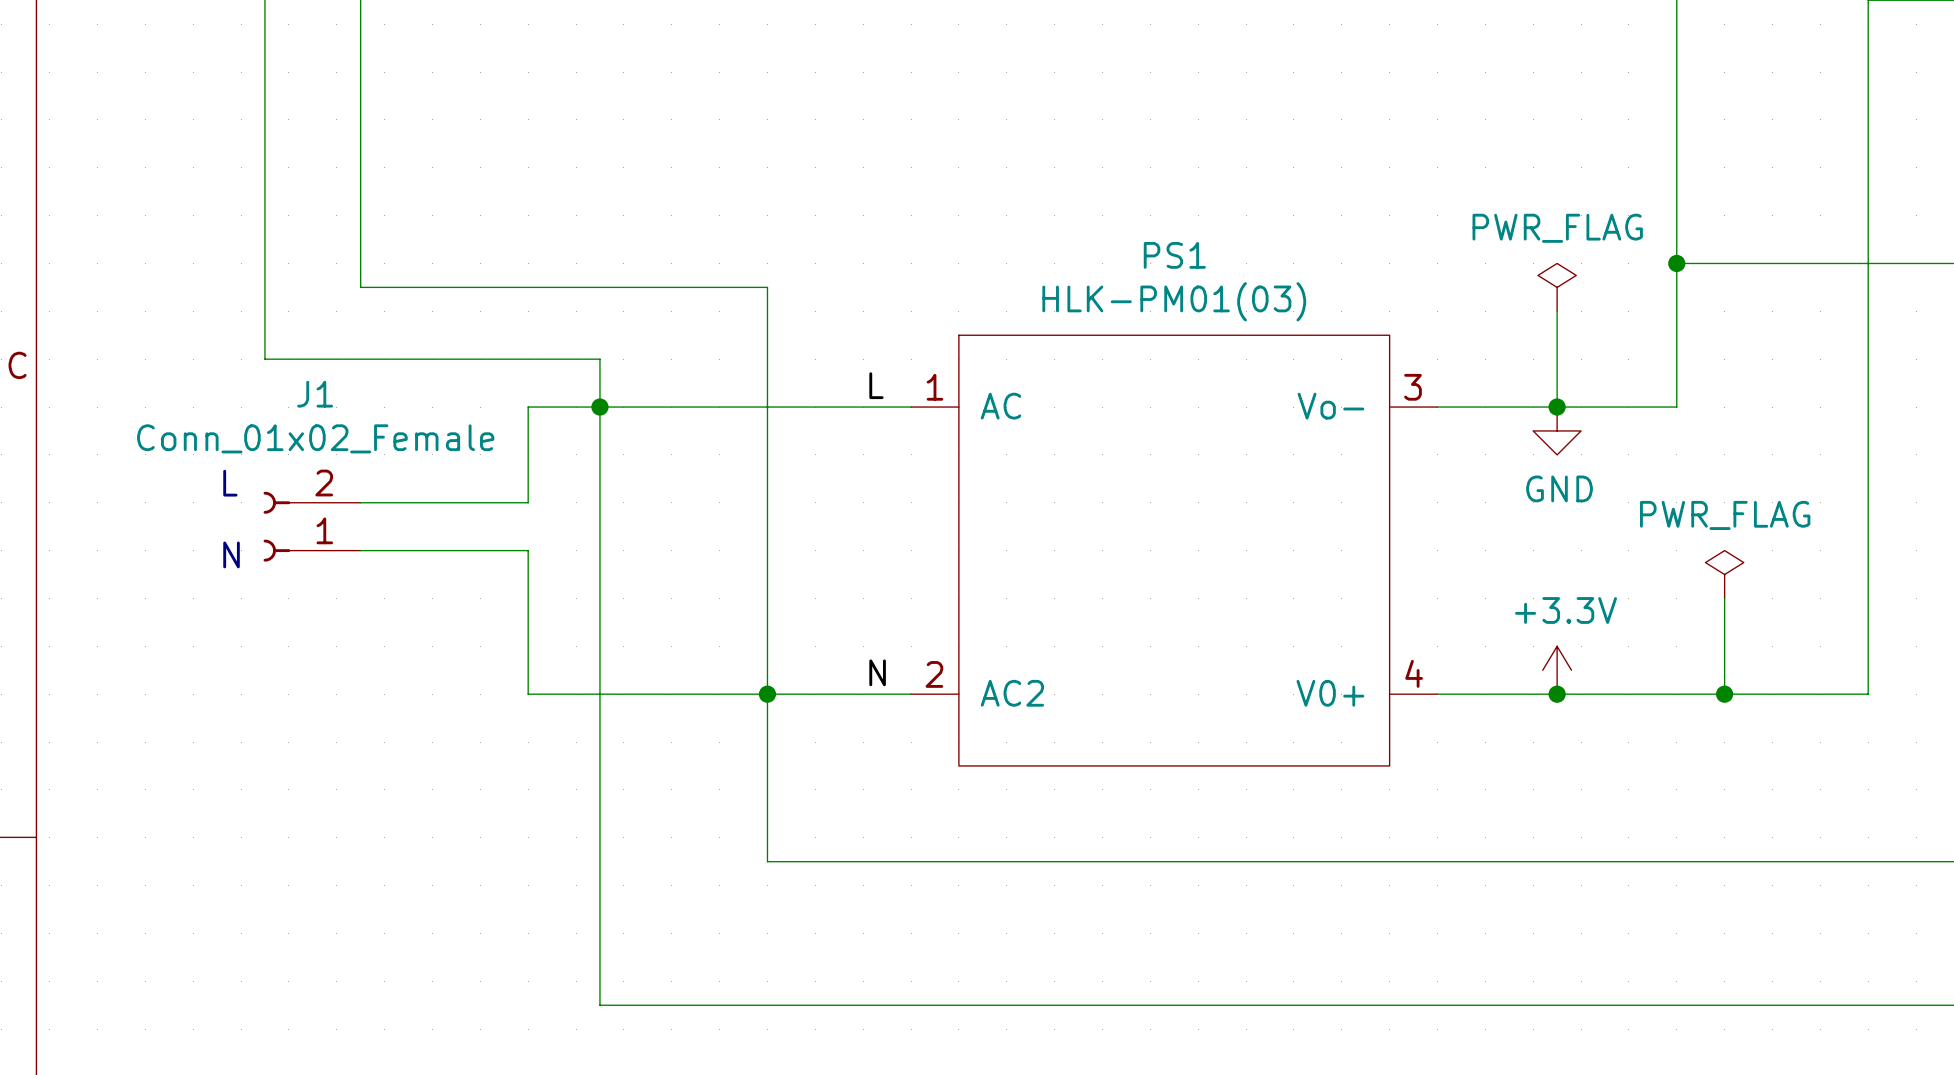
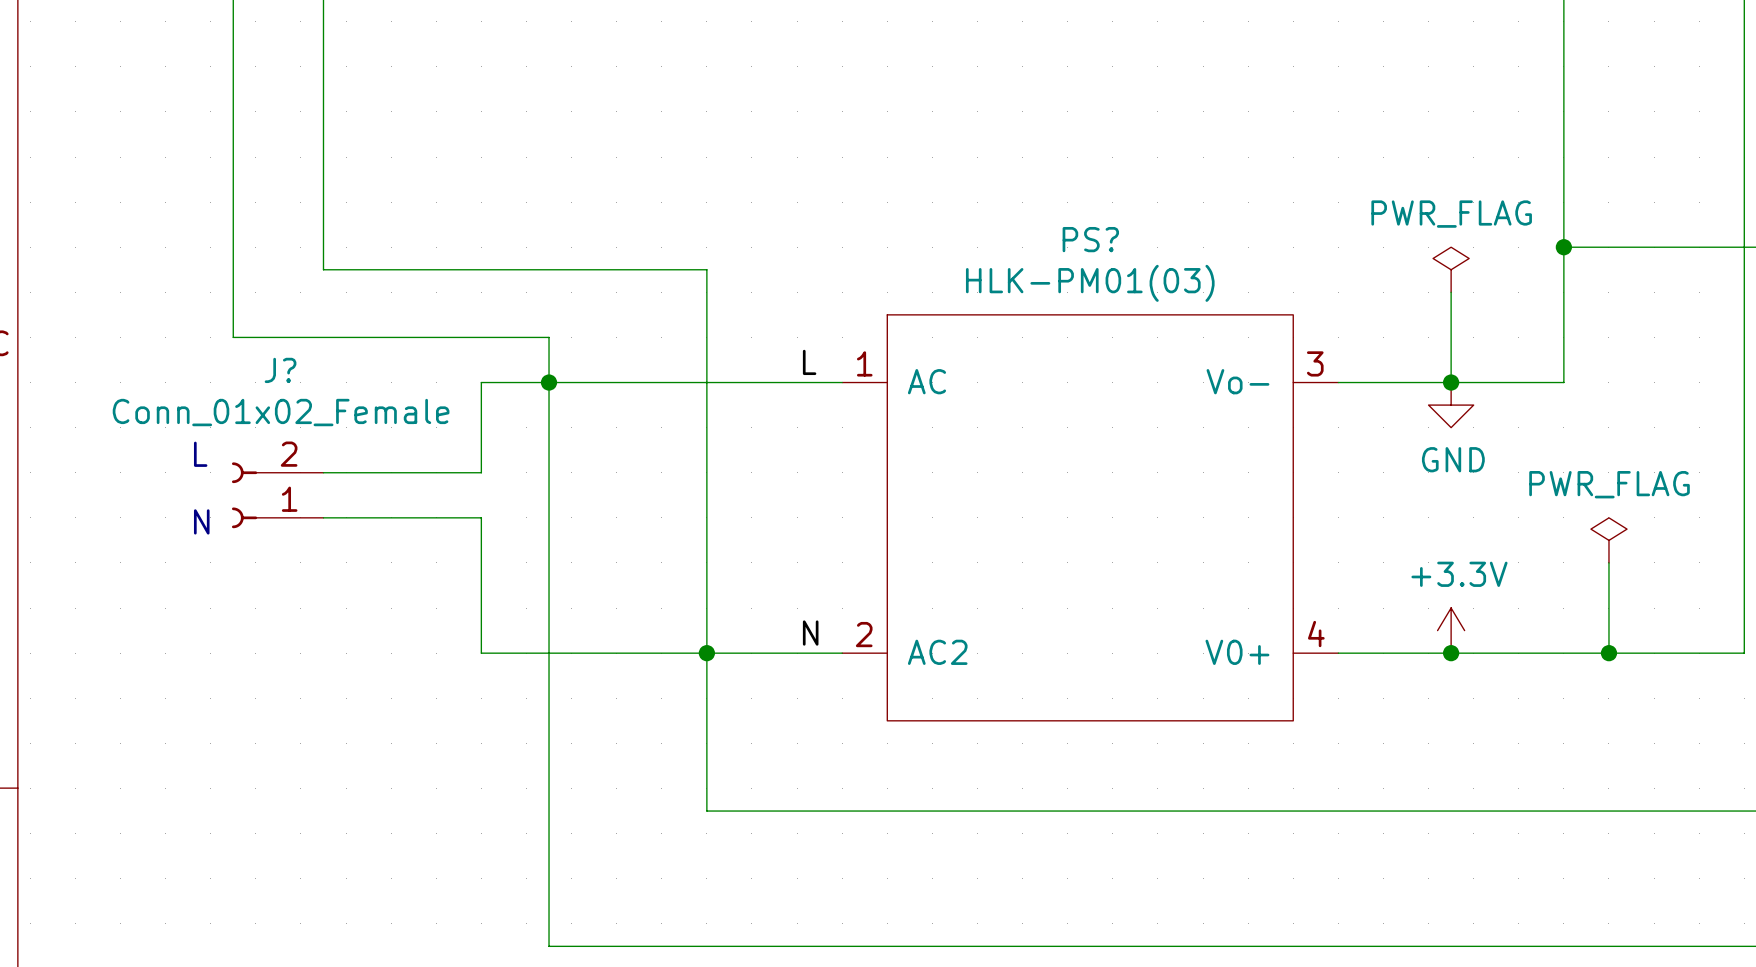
PS1 name: PS1 (1174, 255) -> PS? (1090, 239)
J1 name: J1 (315, 394) -> J? (280, 370)

